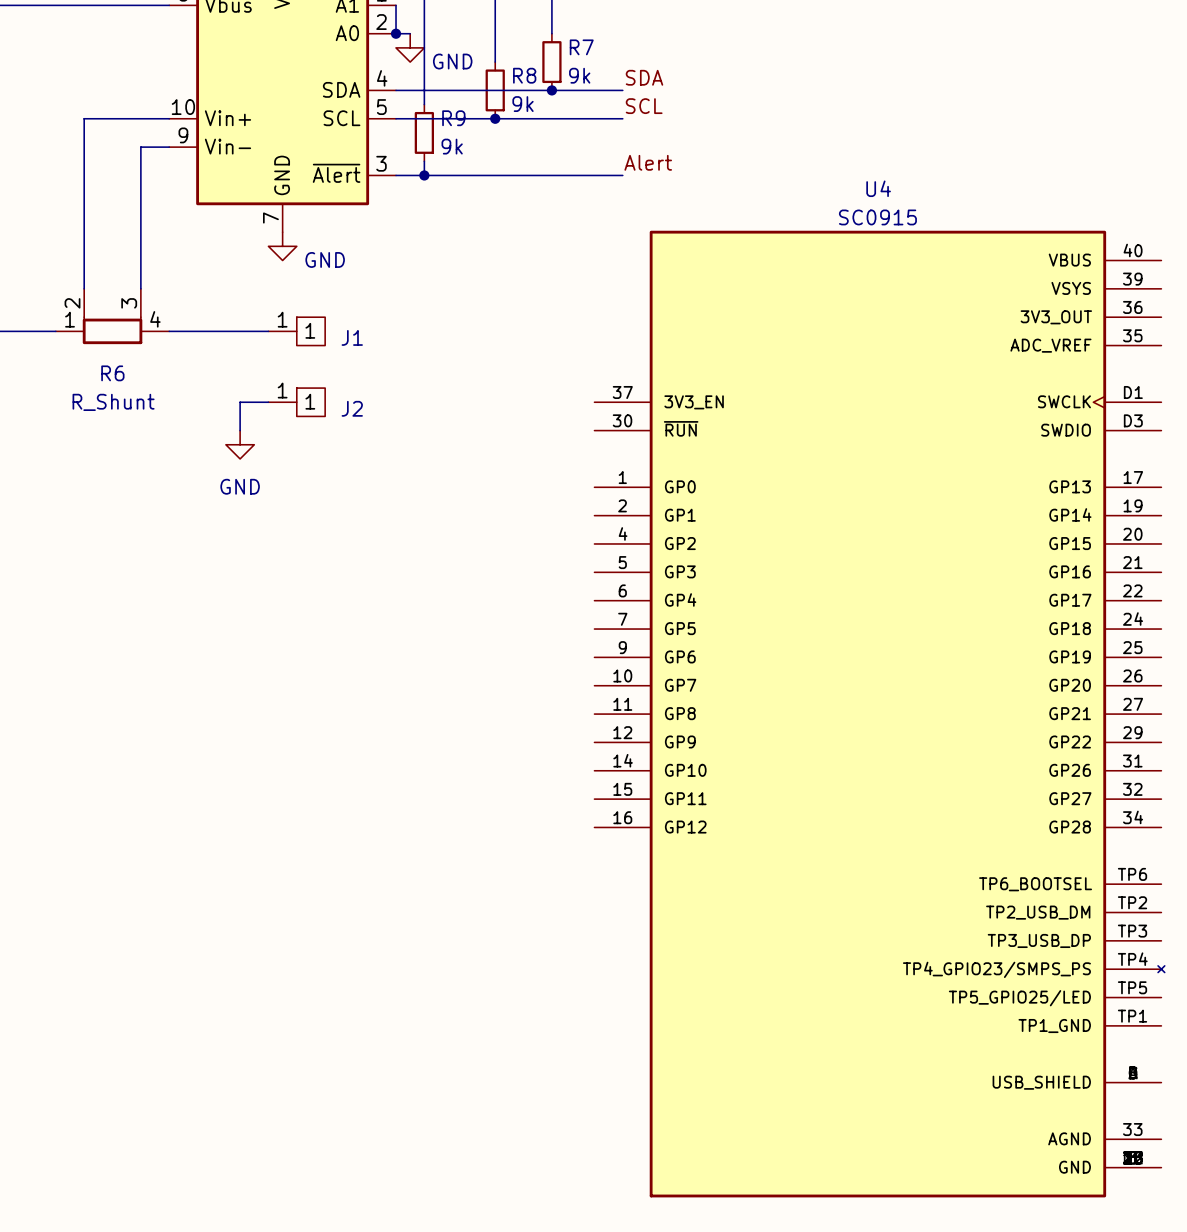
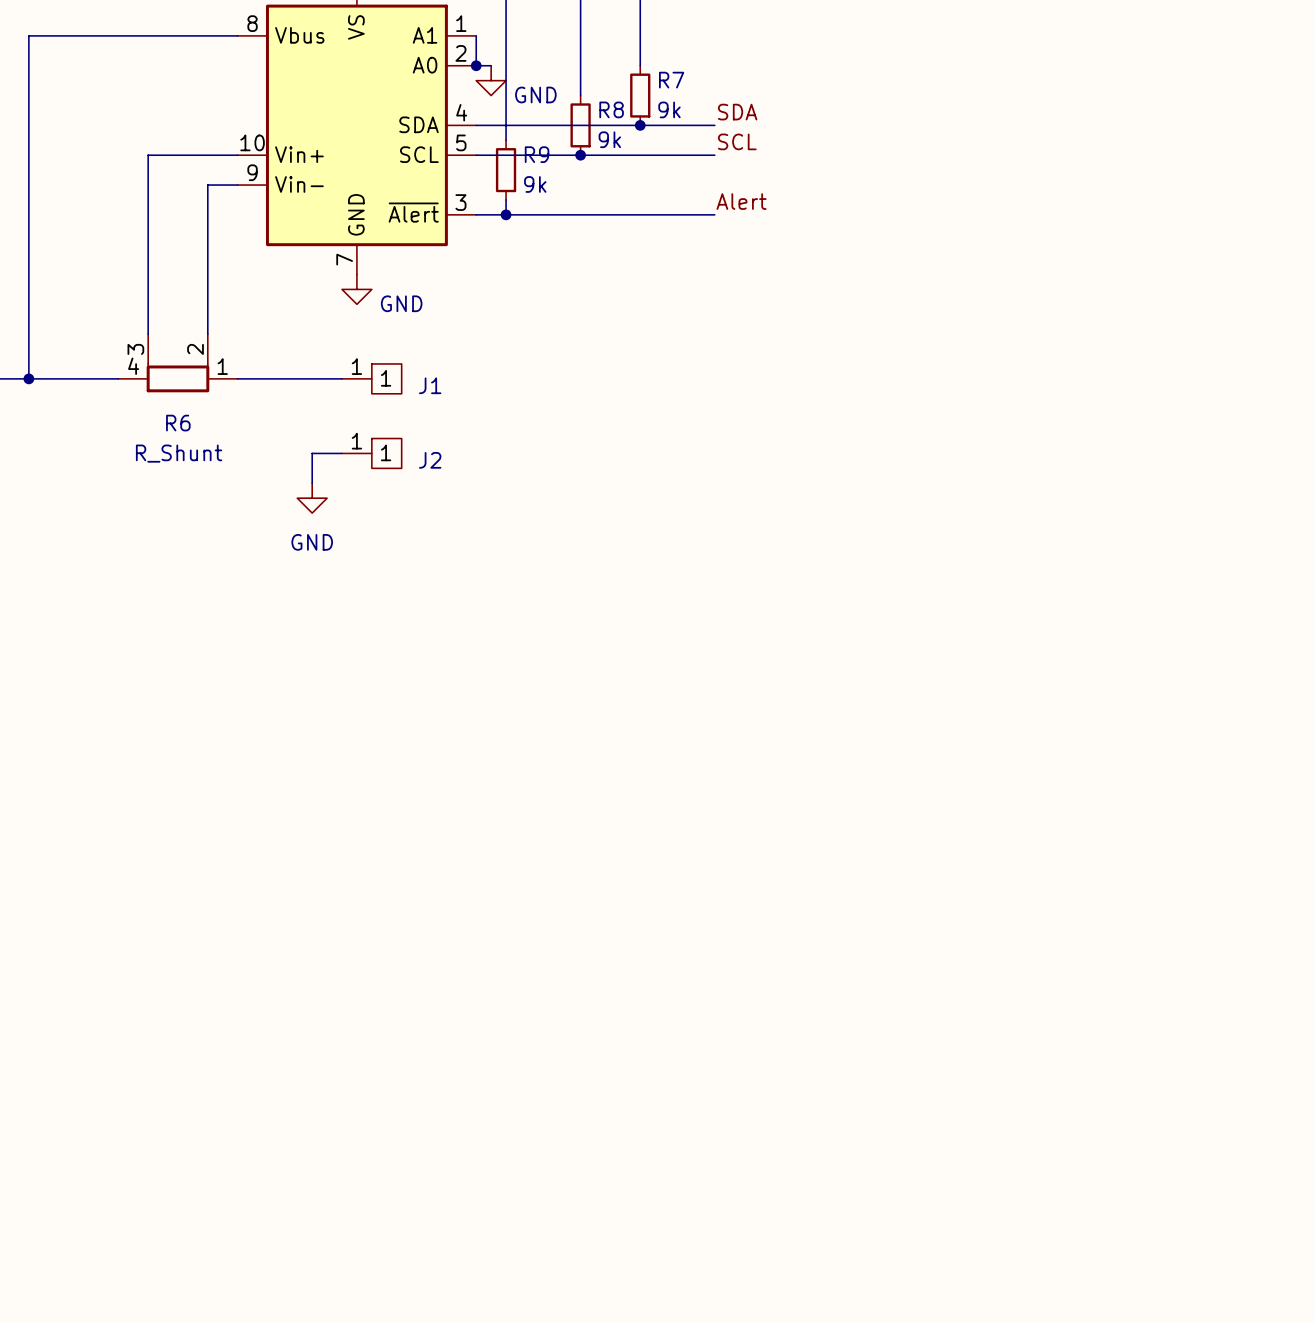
R6 flip: as is (112, 330) -> left-right (177, 378)
U4: SC0915 (879, 714) -> none

